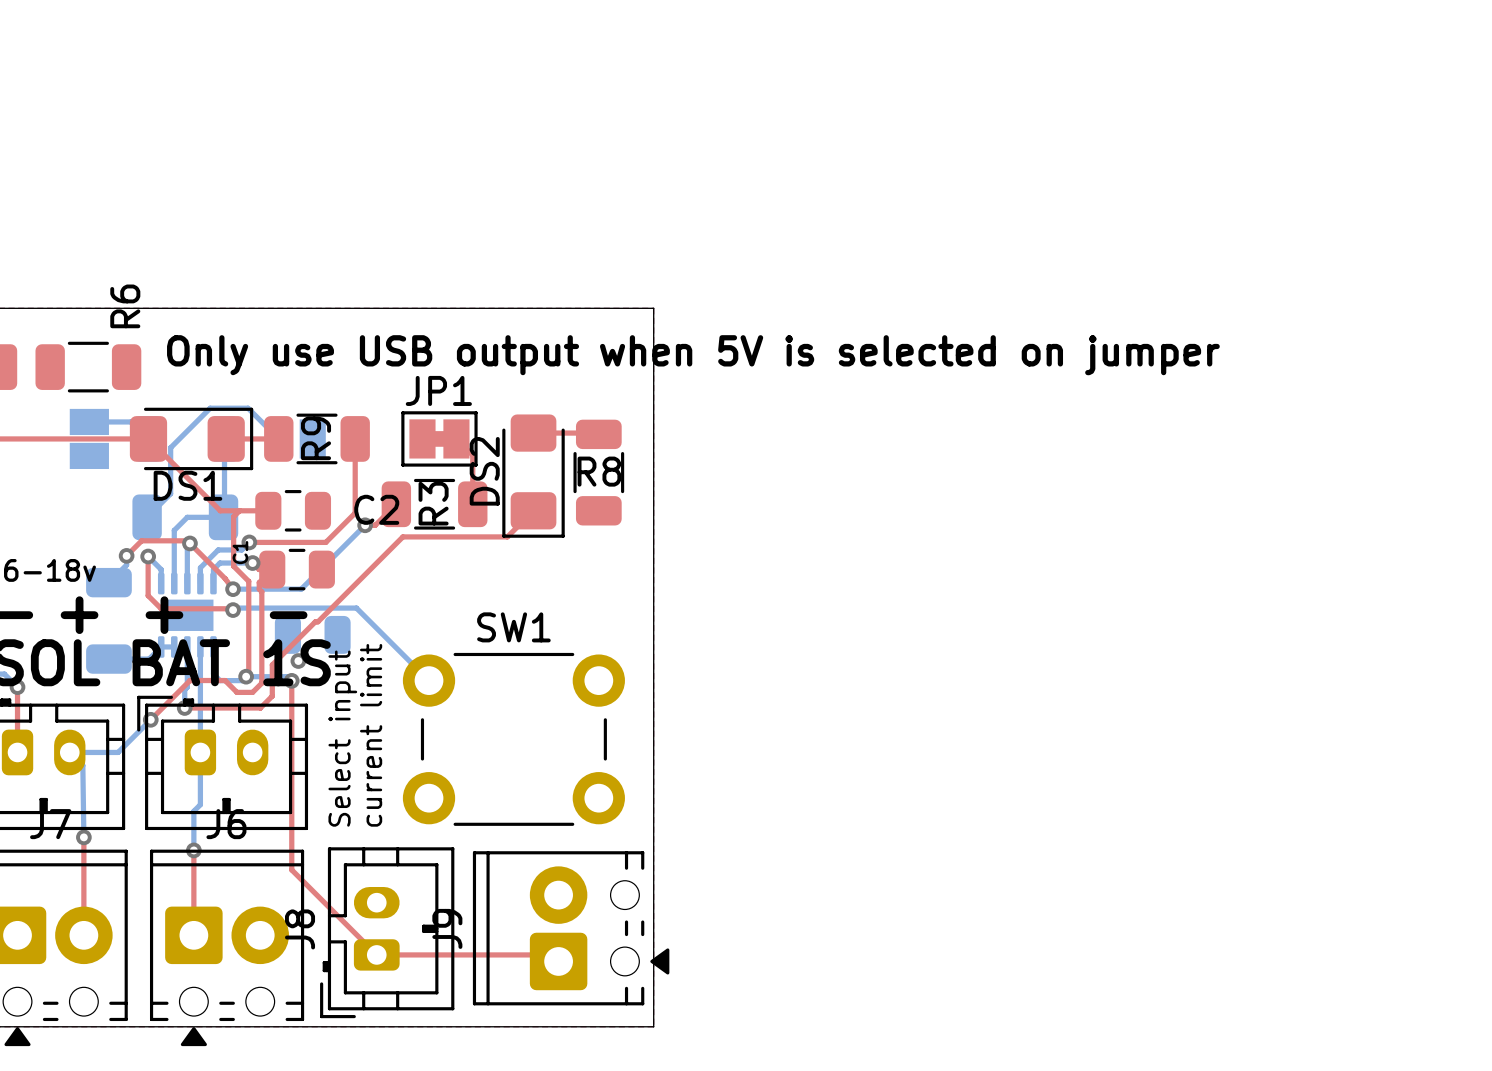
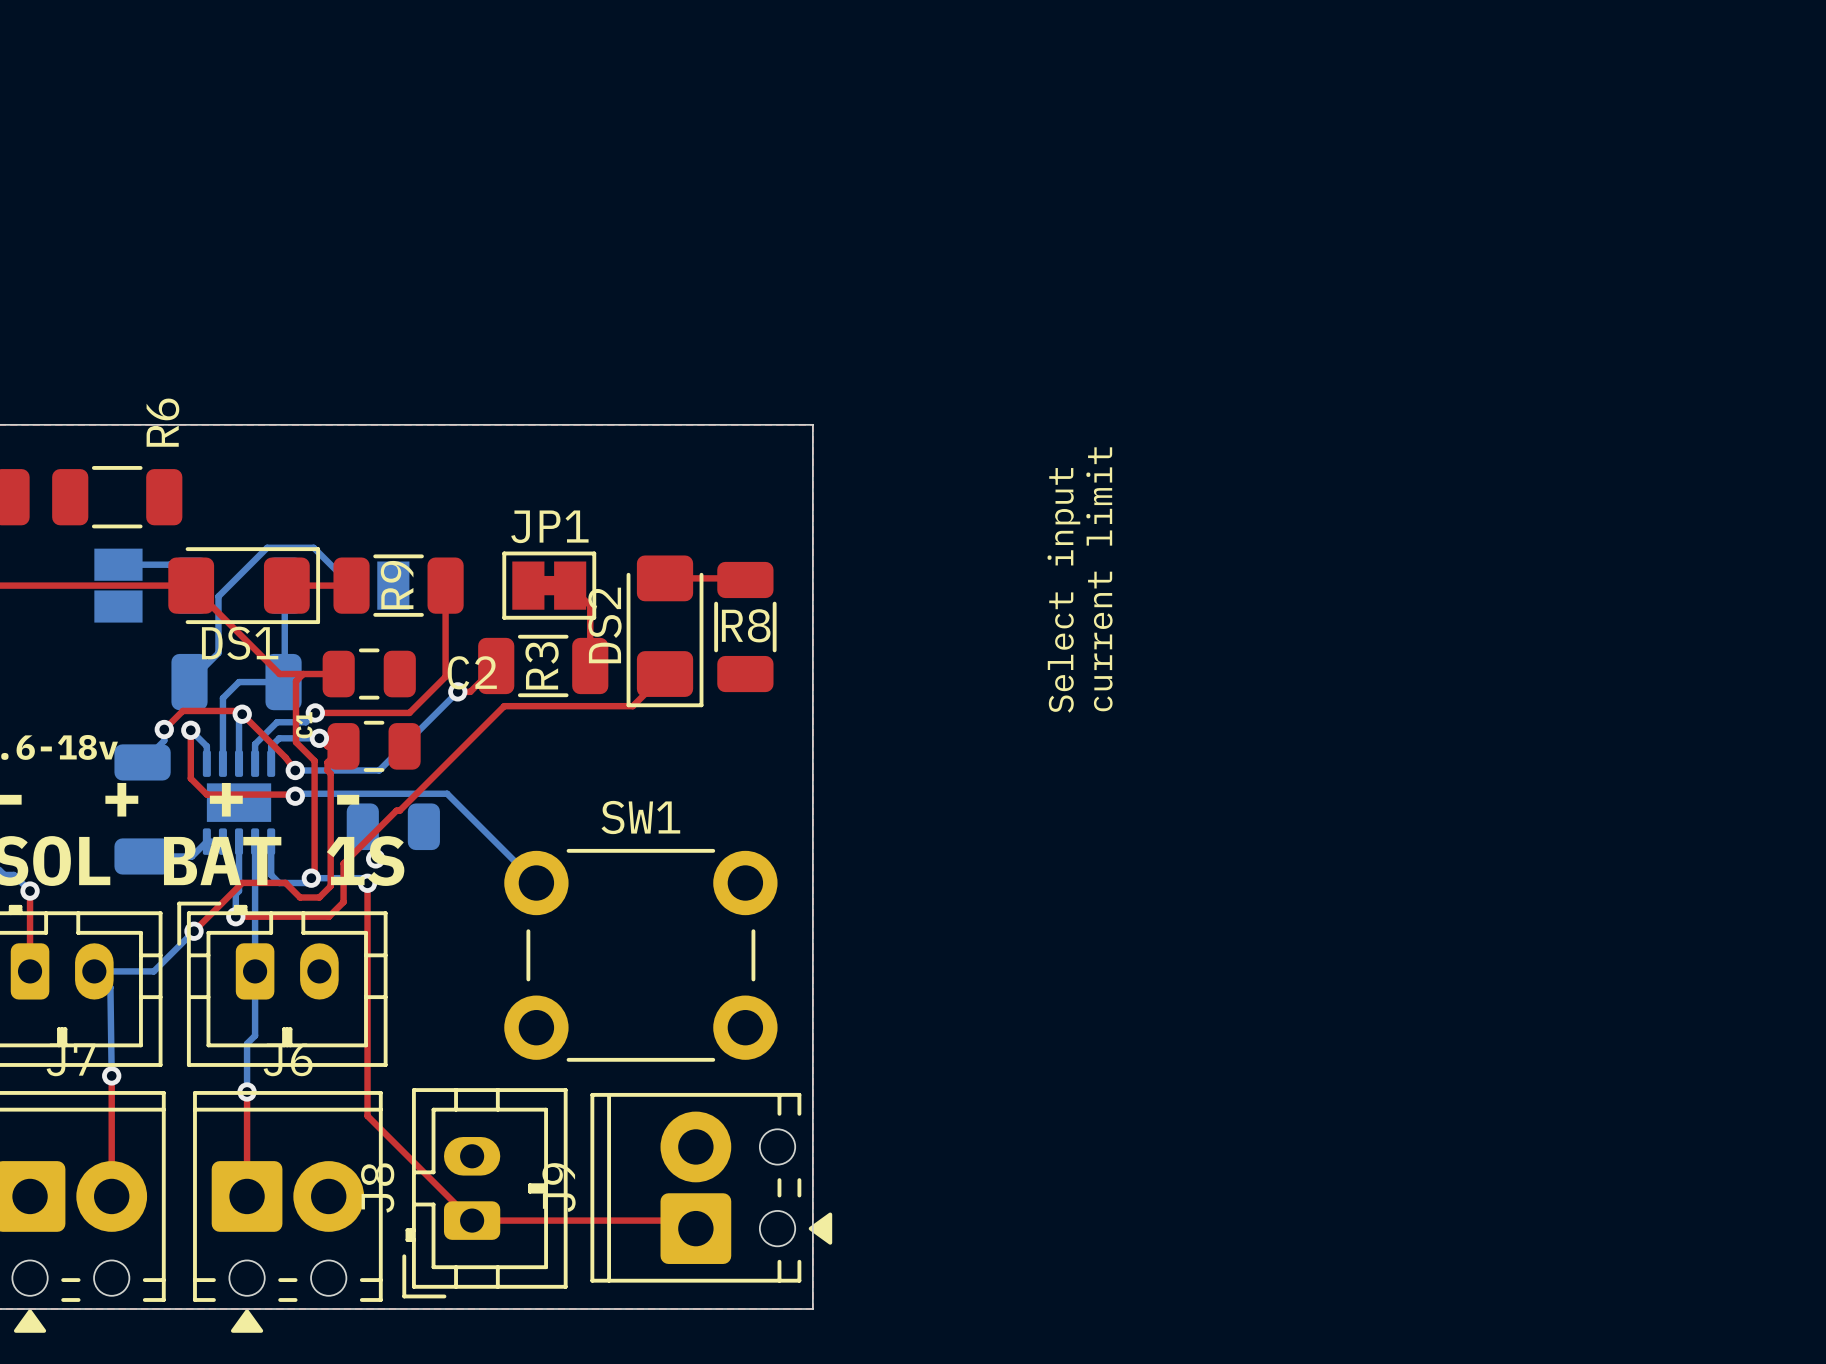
text: Only use USB output when 5V is selected on jumper (693, 355) -> none
text position: current limit (371, 735) -> current limit (1099, 579)
text position: Select input (342, 738) -> Select input (1063, 590)

